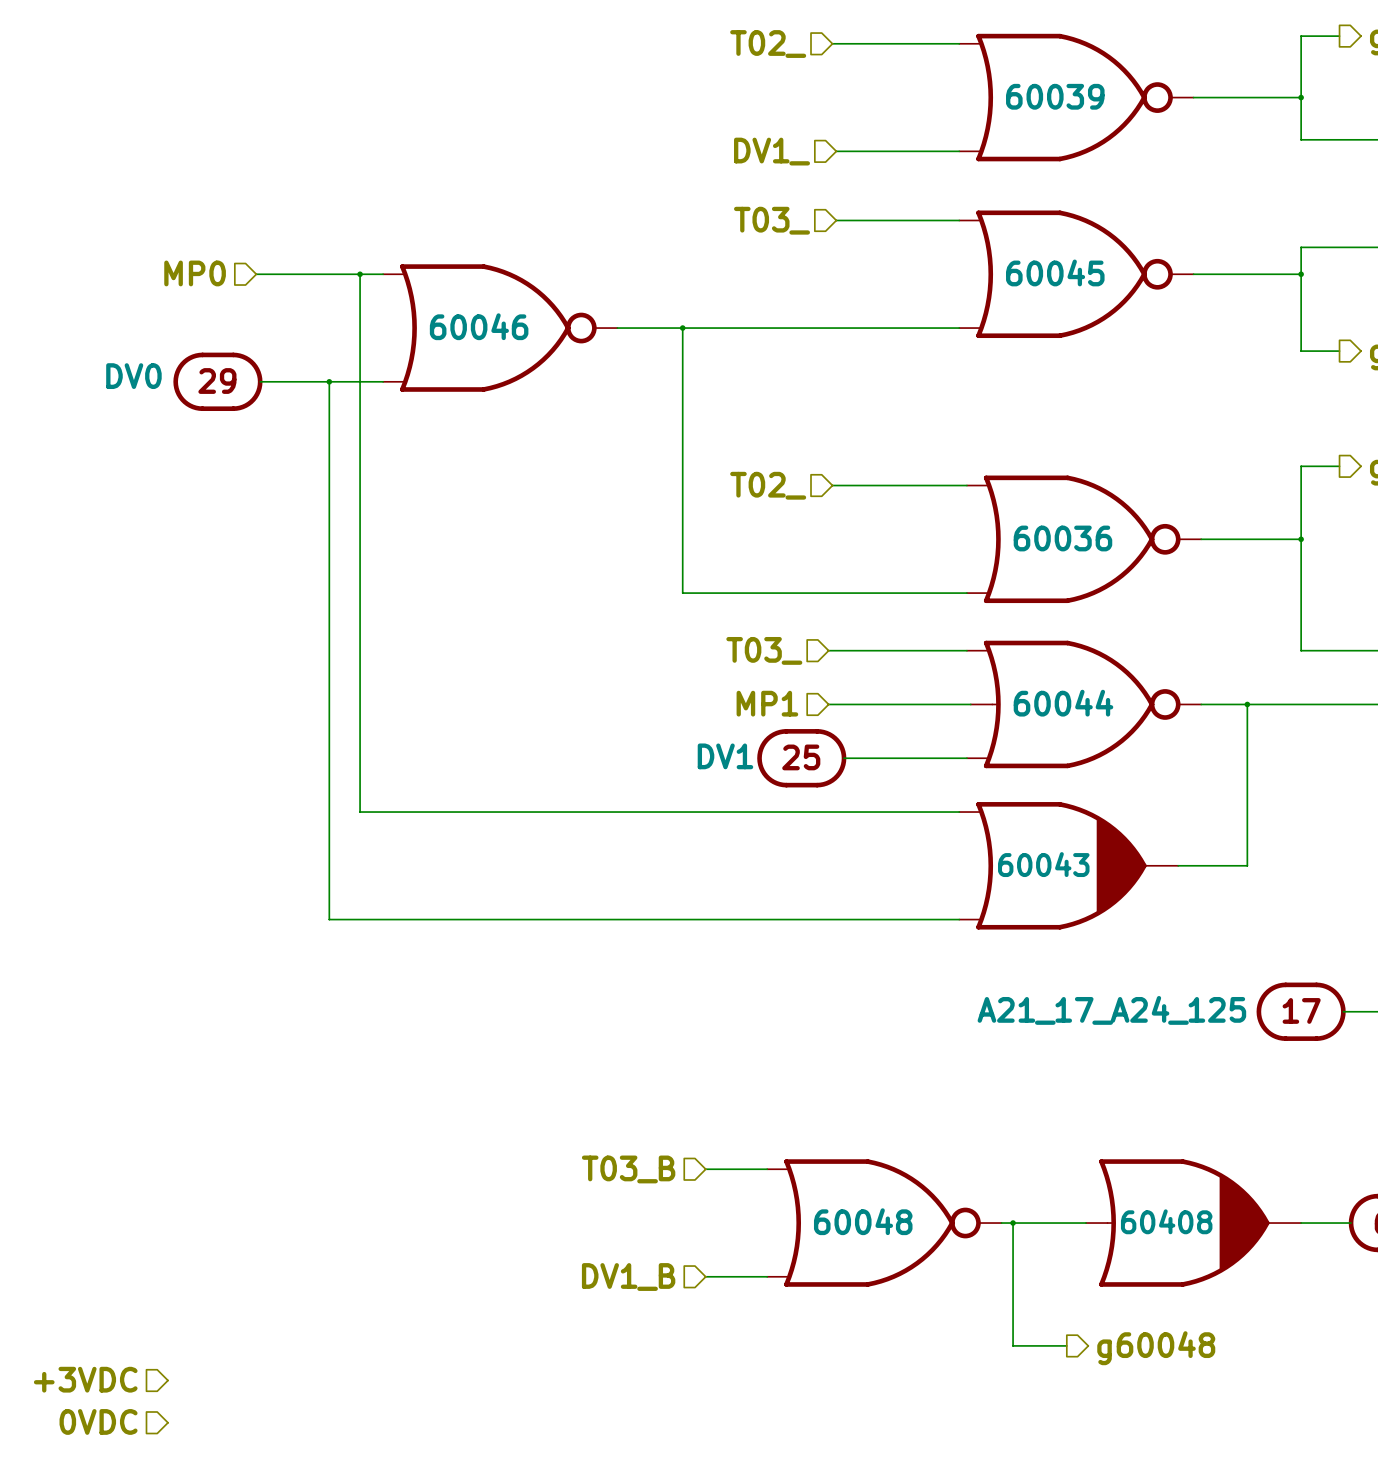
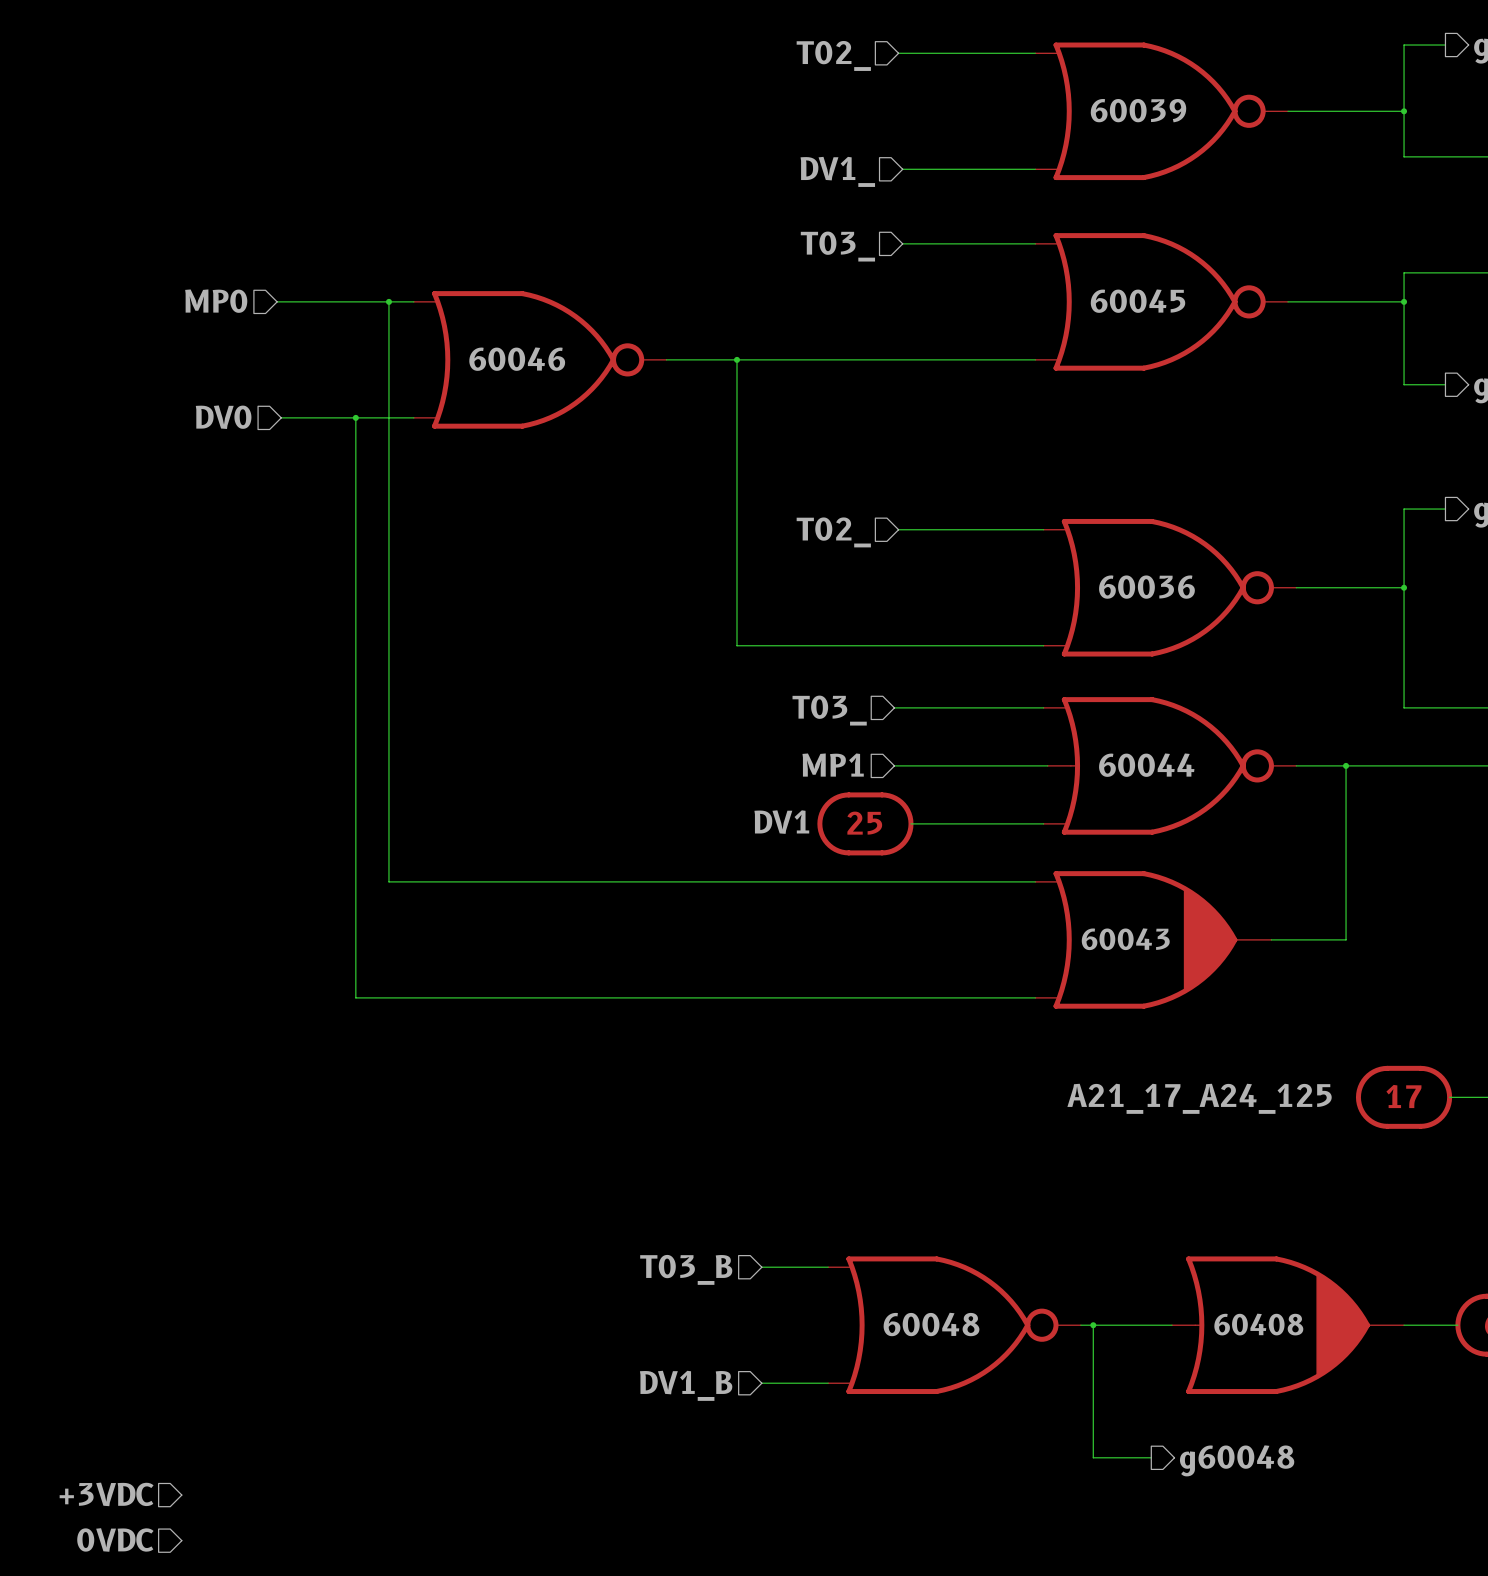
hierarchical label: none -> DV0 (223, 417)
part: (217, 381) -> none

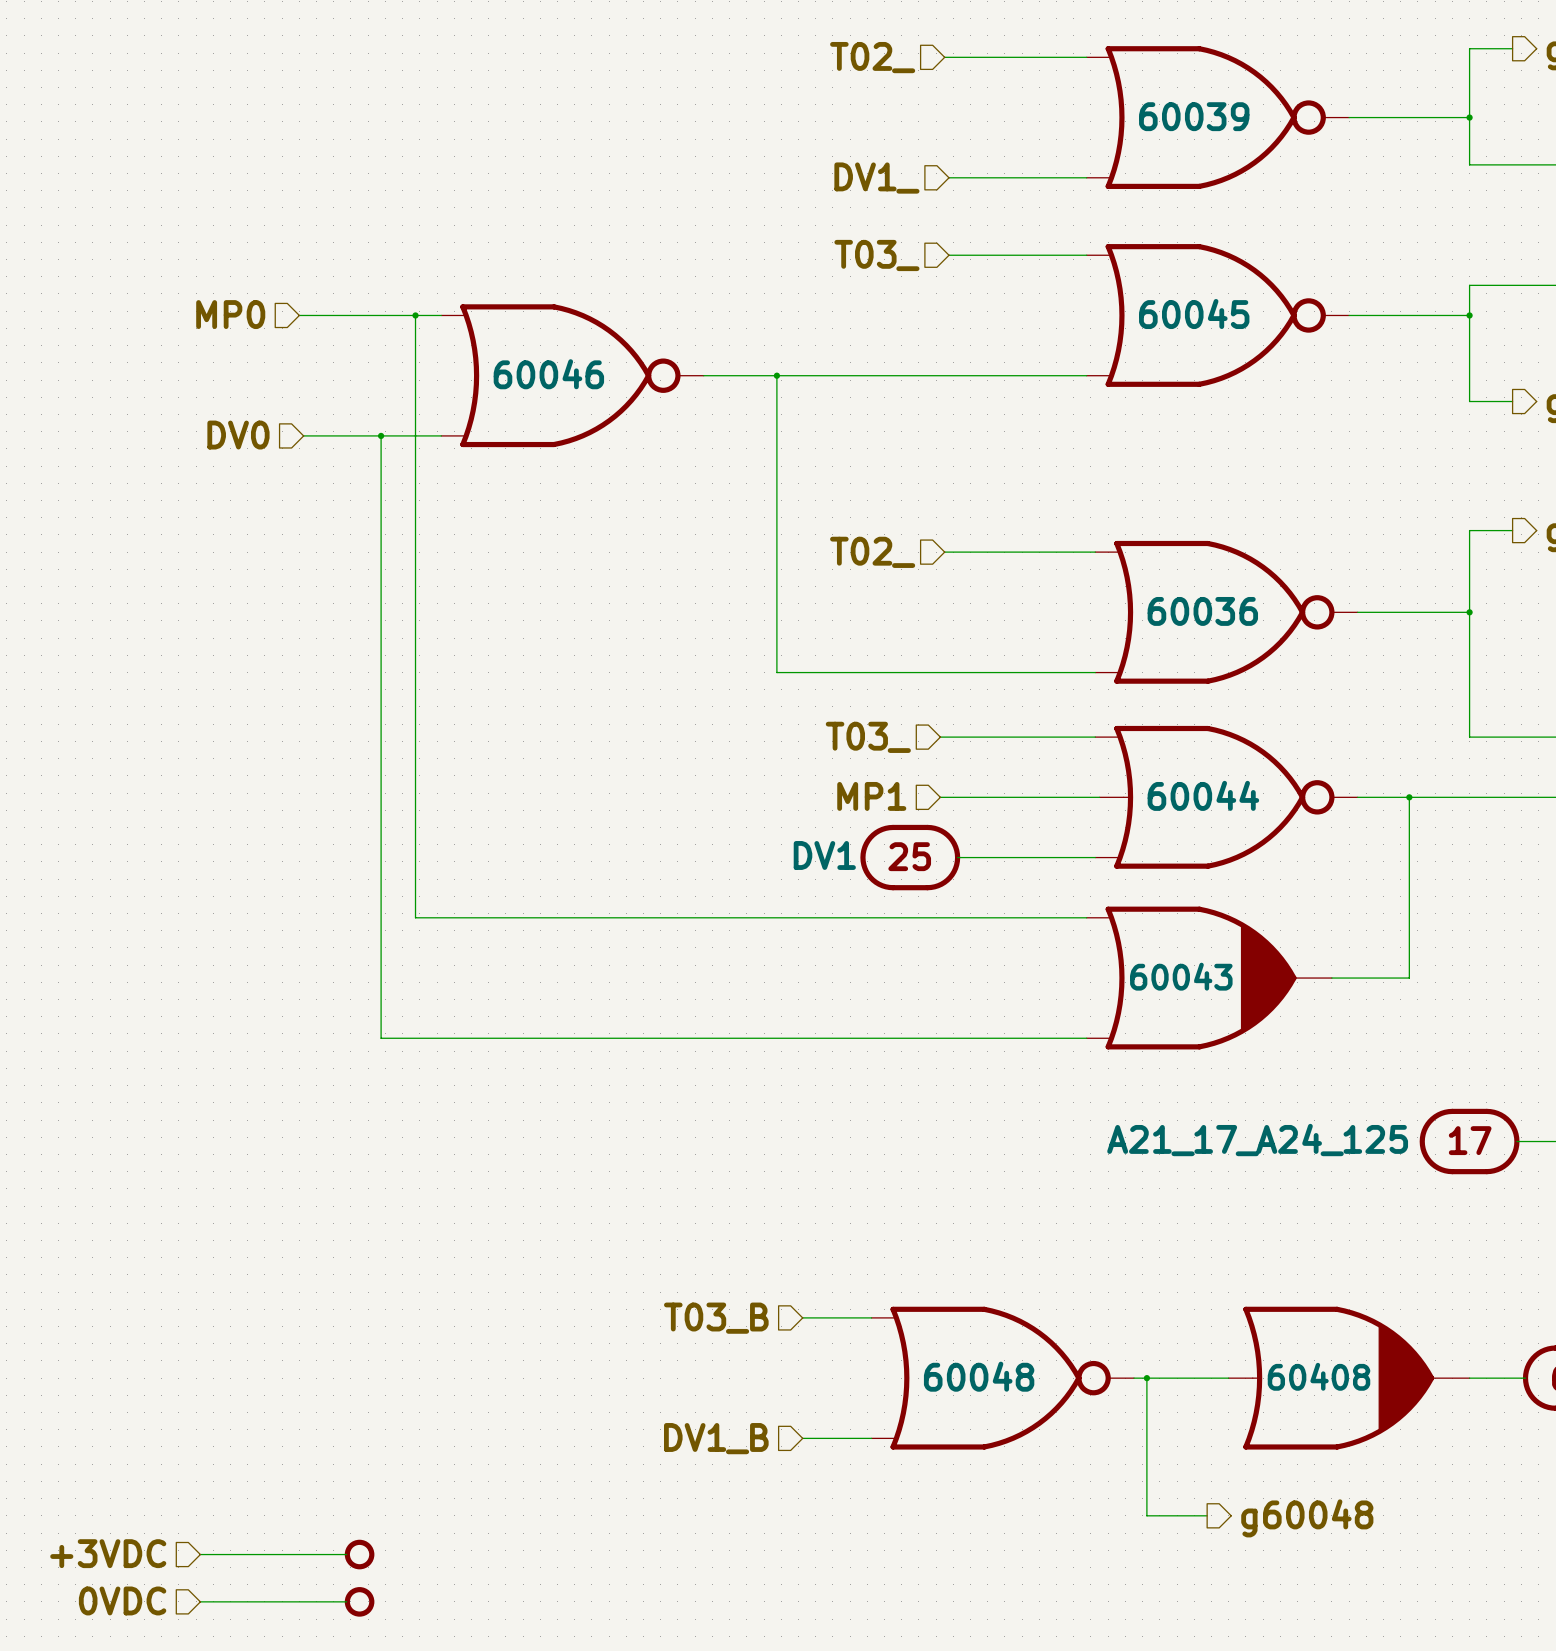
wire: none -> (200, 1554) (346, 1554)
part: none -> (359, 1554)
wire: none -> (200, 1601) (346, 1601)
part: none -> (359, 1601)

